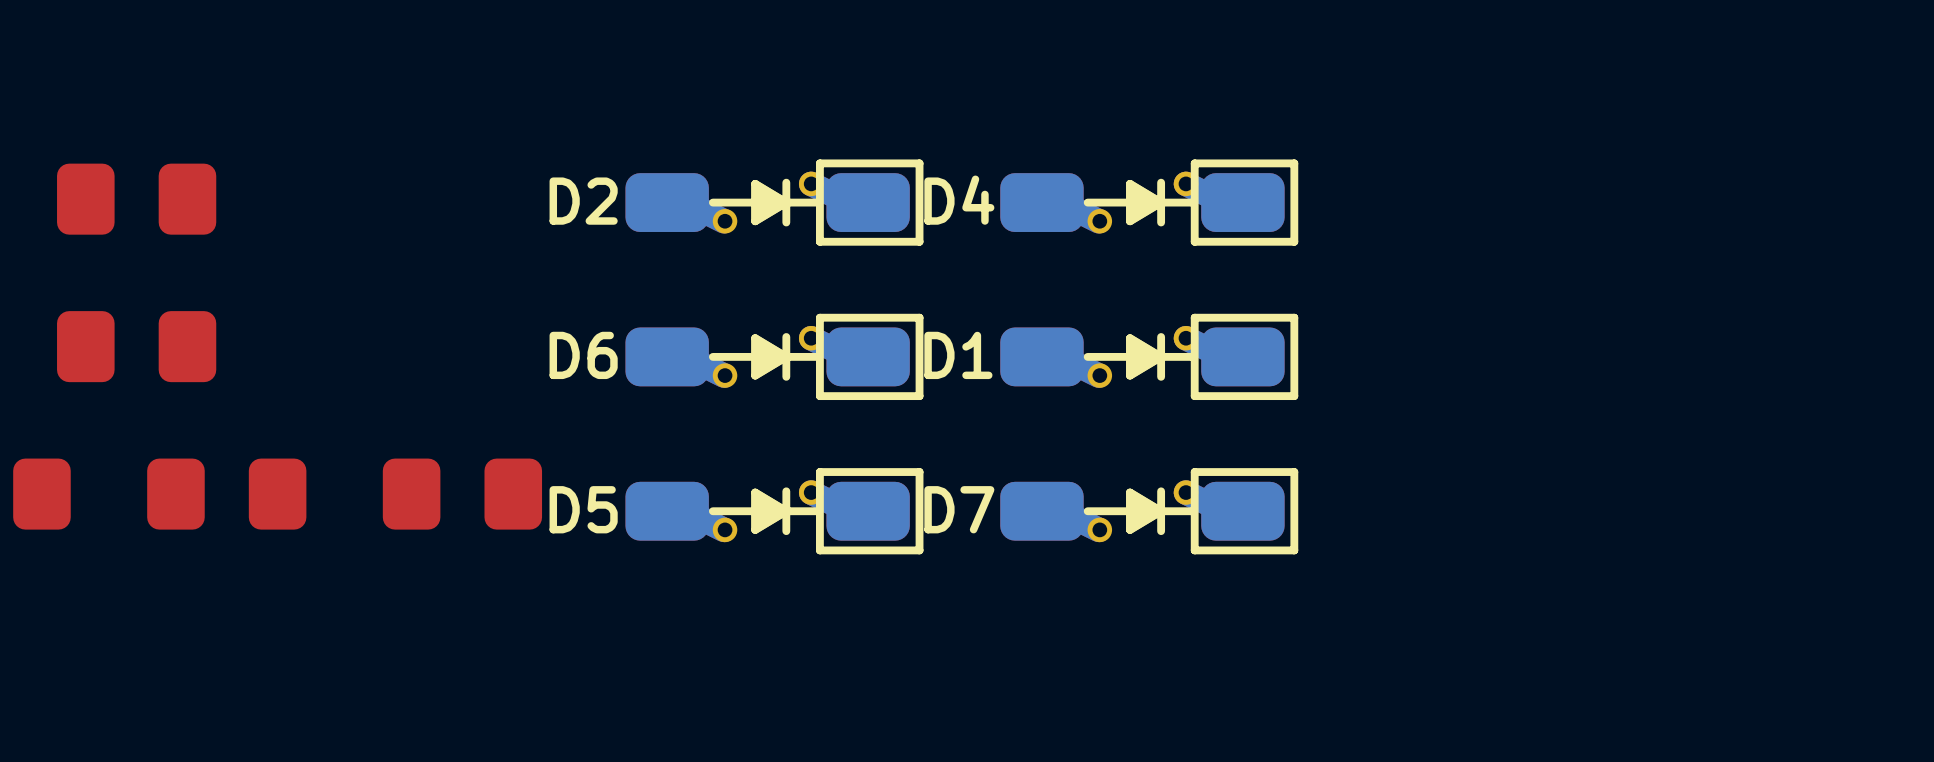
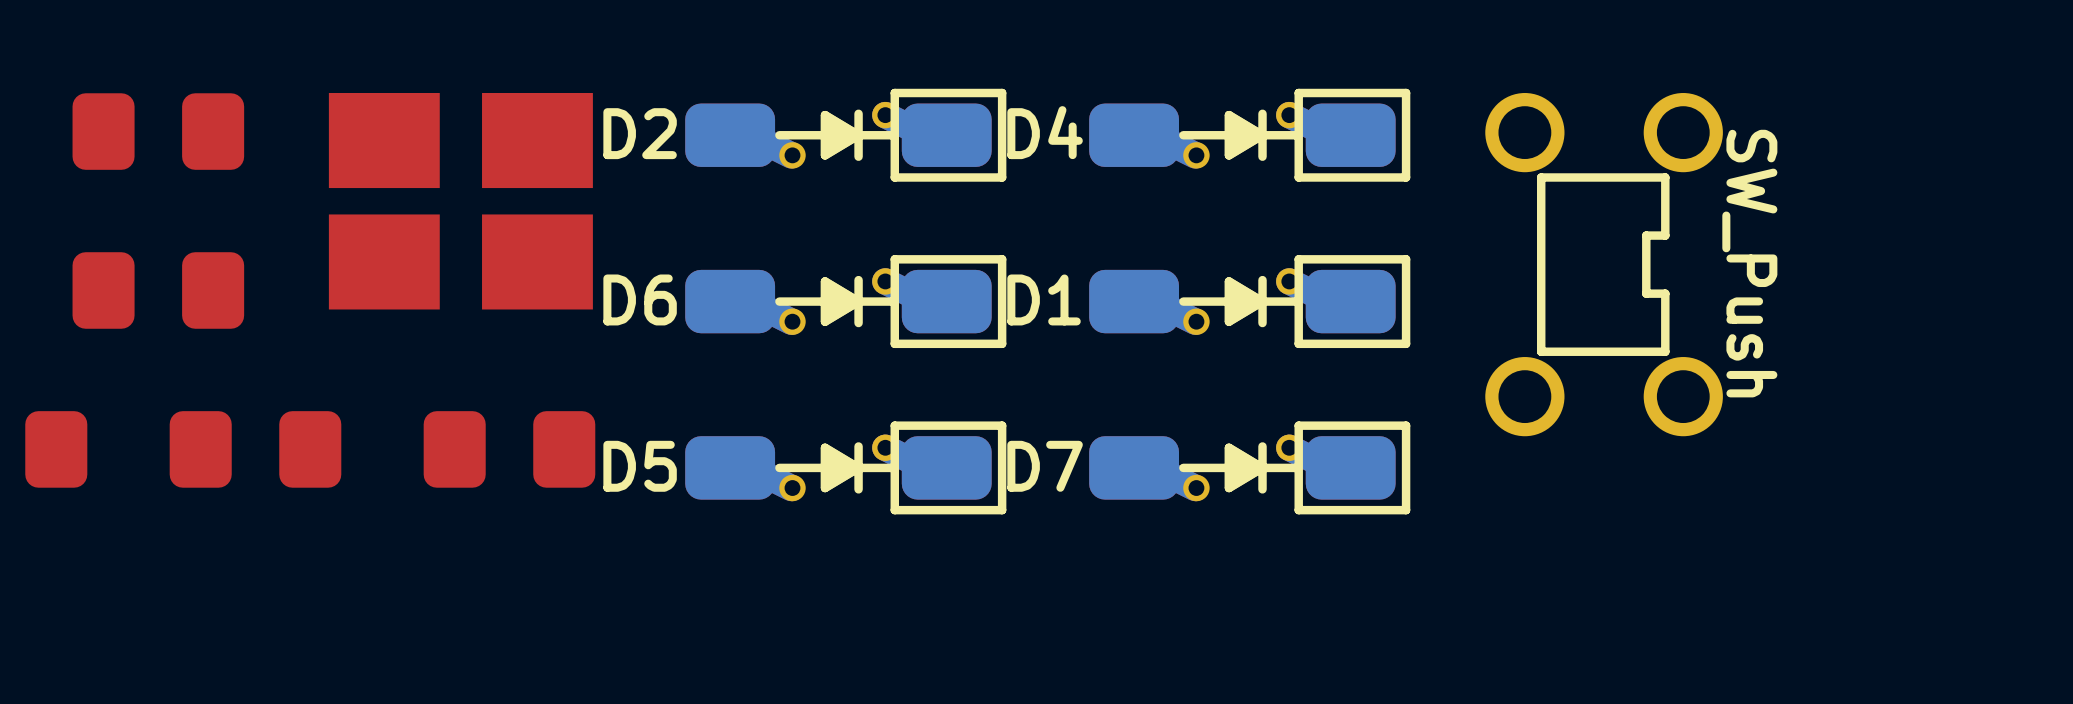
part: none -> (460, 201)
part: none -> SW_Push (1604, 264)

